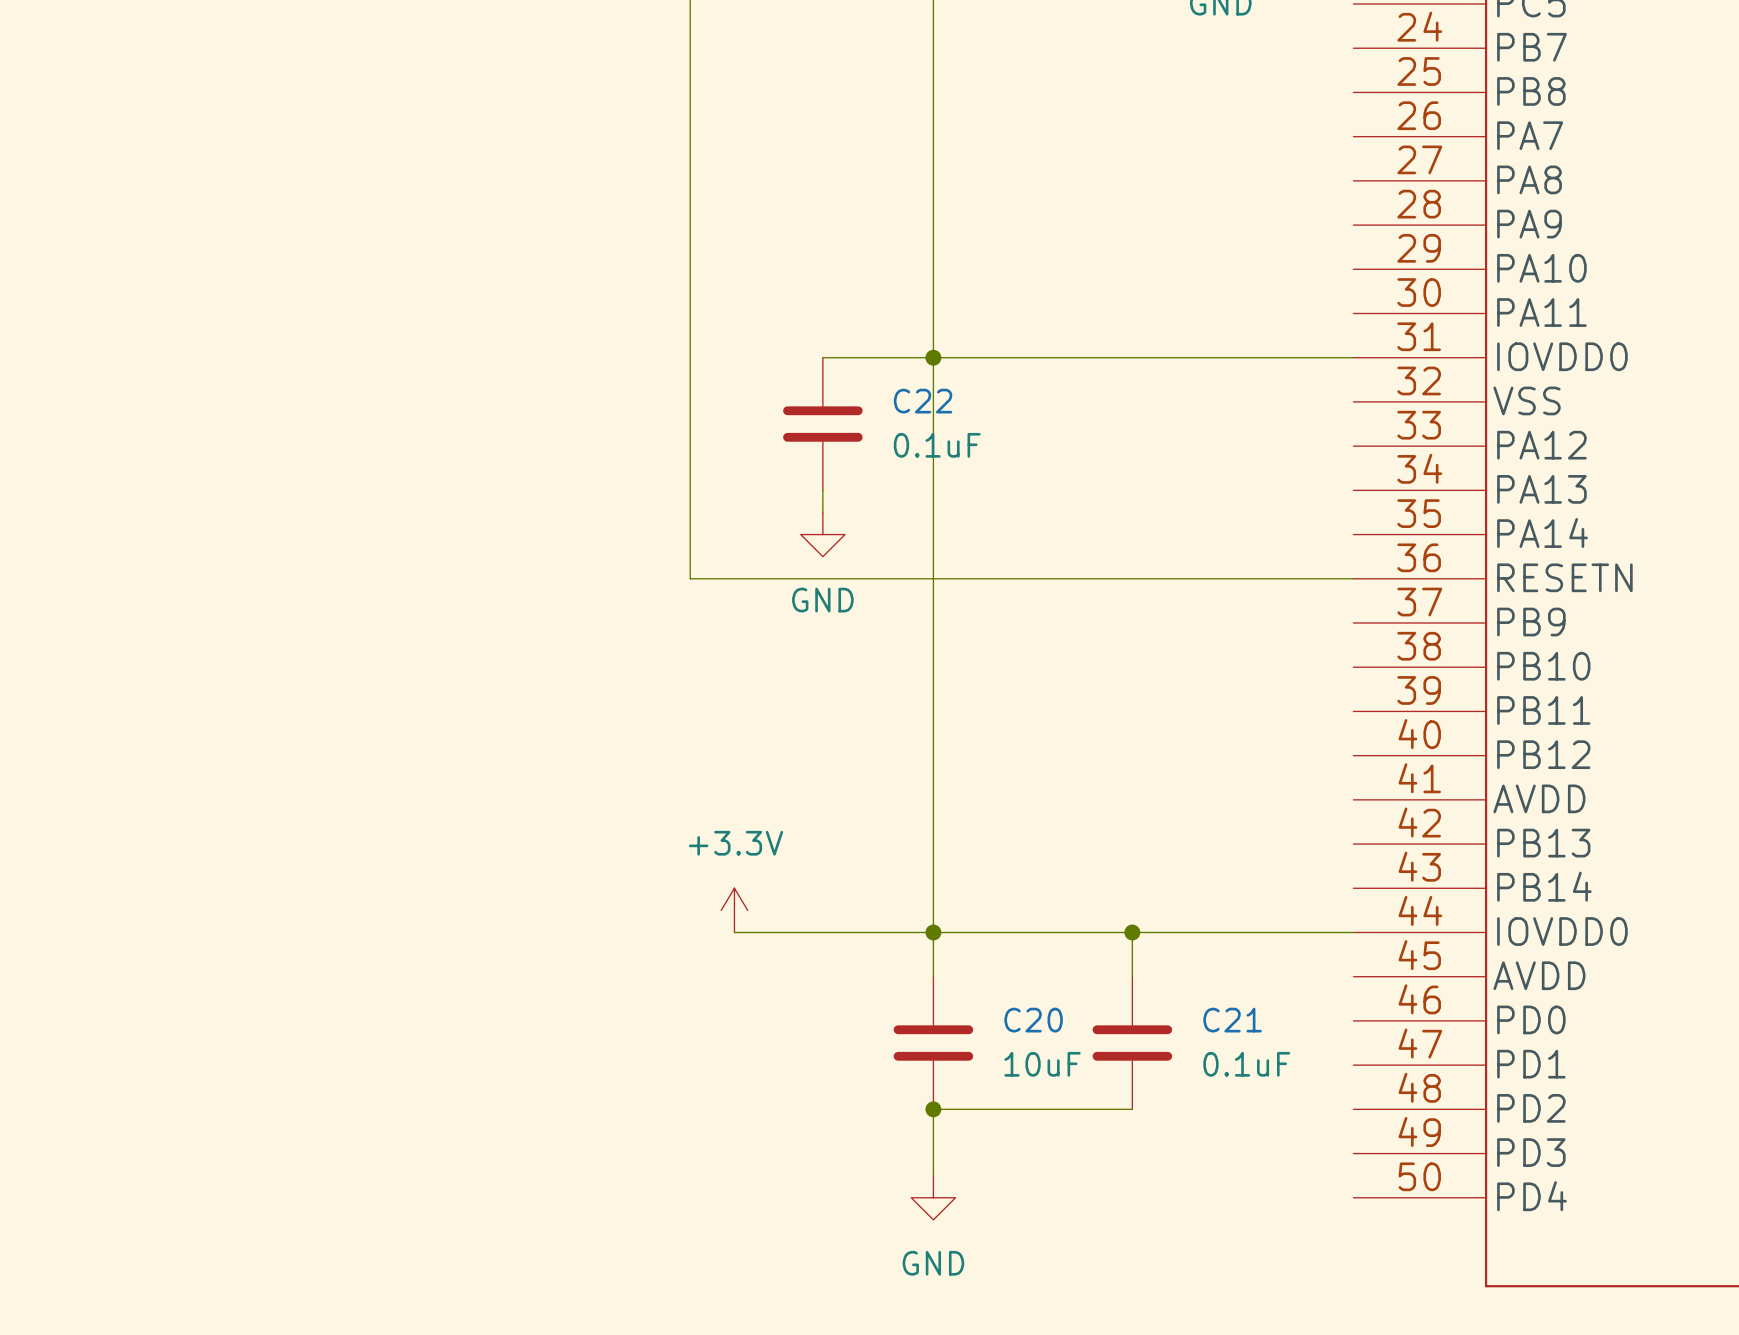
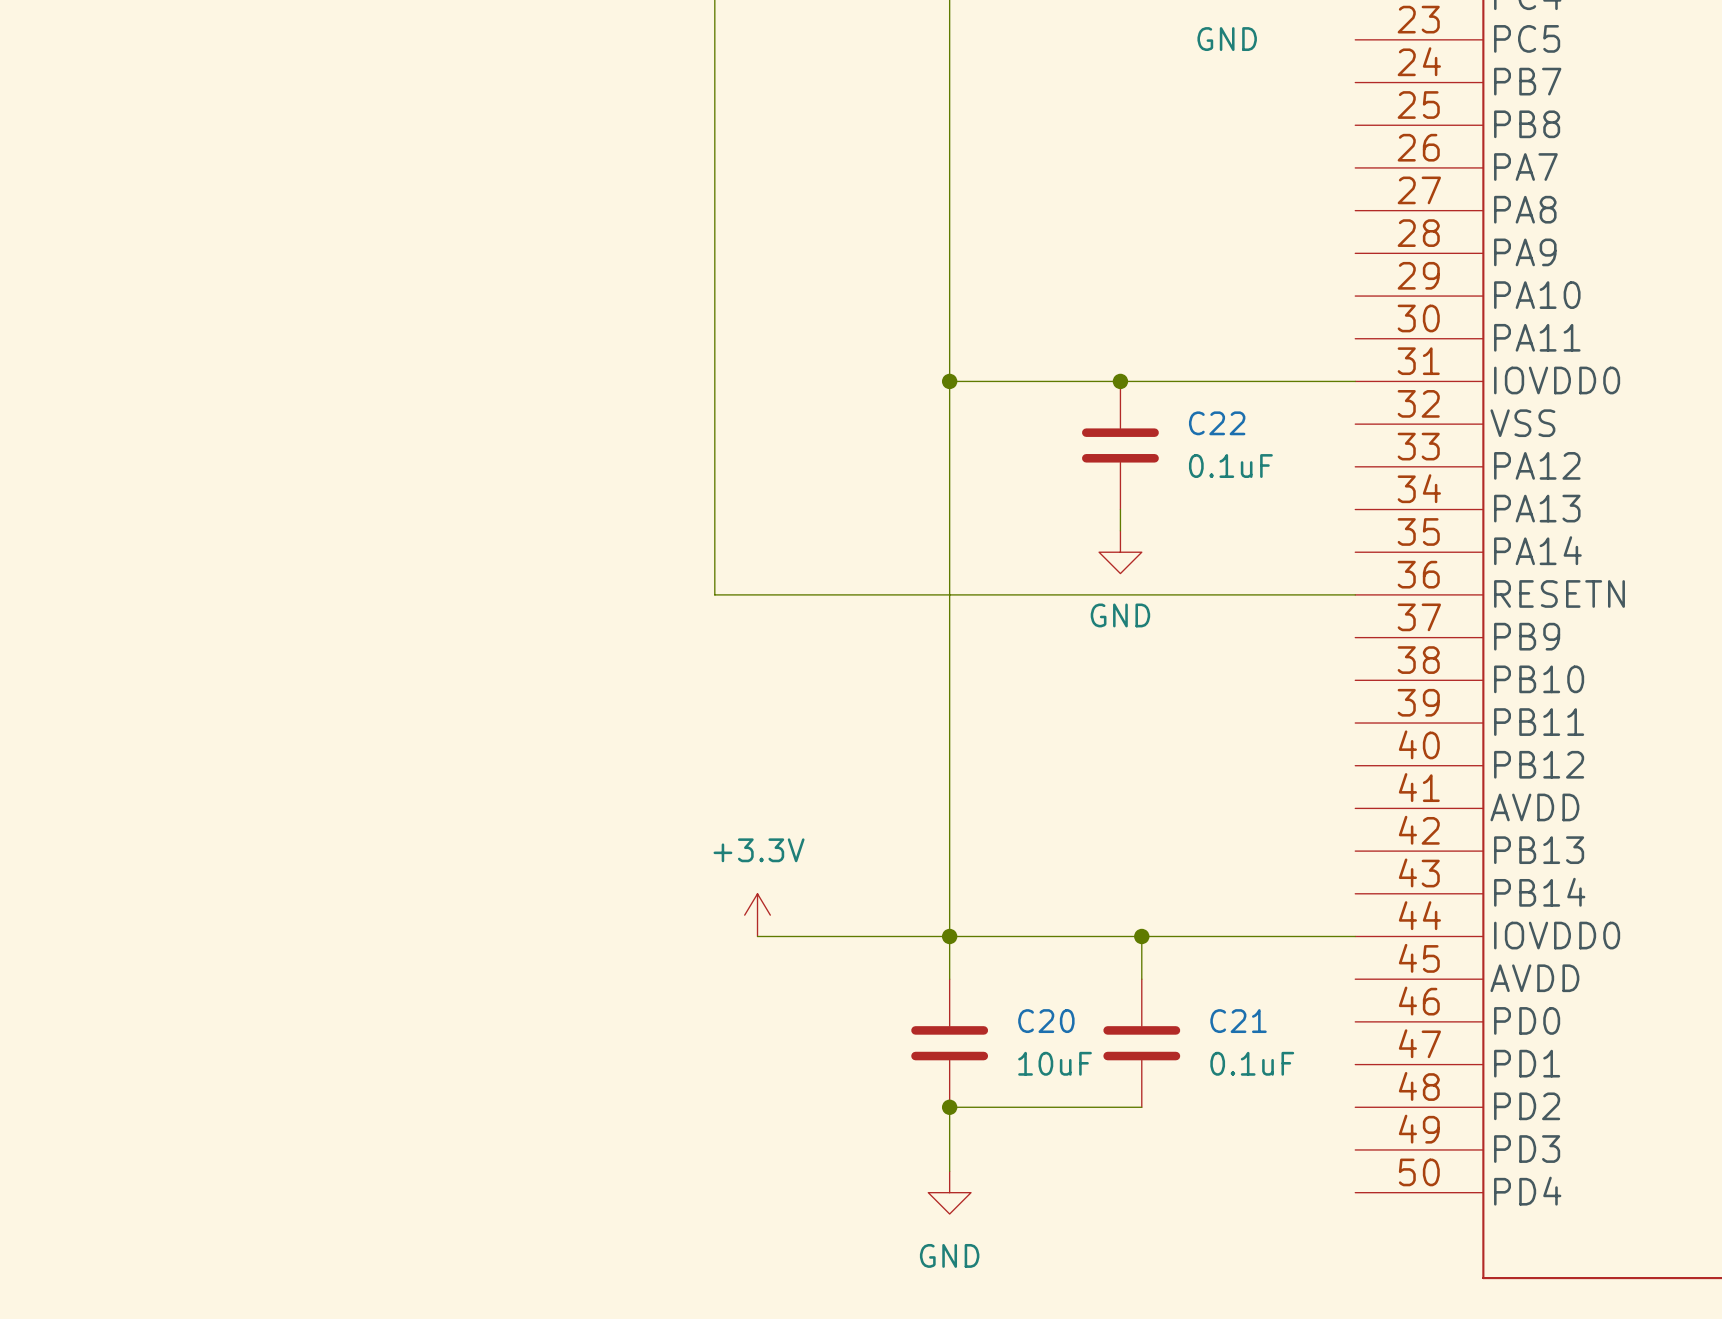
wire: (822, 357) (933, 357) -> none
junction: none -> (1120, 381)
C22 position: (822, 424) -> (1120, 445)
wire: (822, 490) (822, 512) -> (1120, 509) (1120, 530)
power symbol position: GND (822, 534) -> GND (1120, 552)

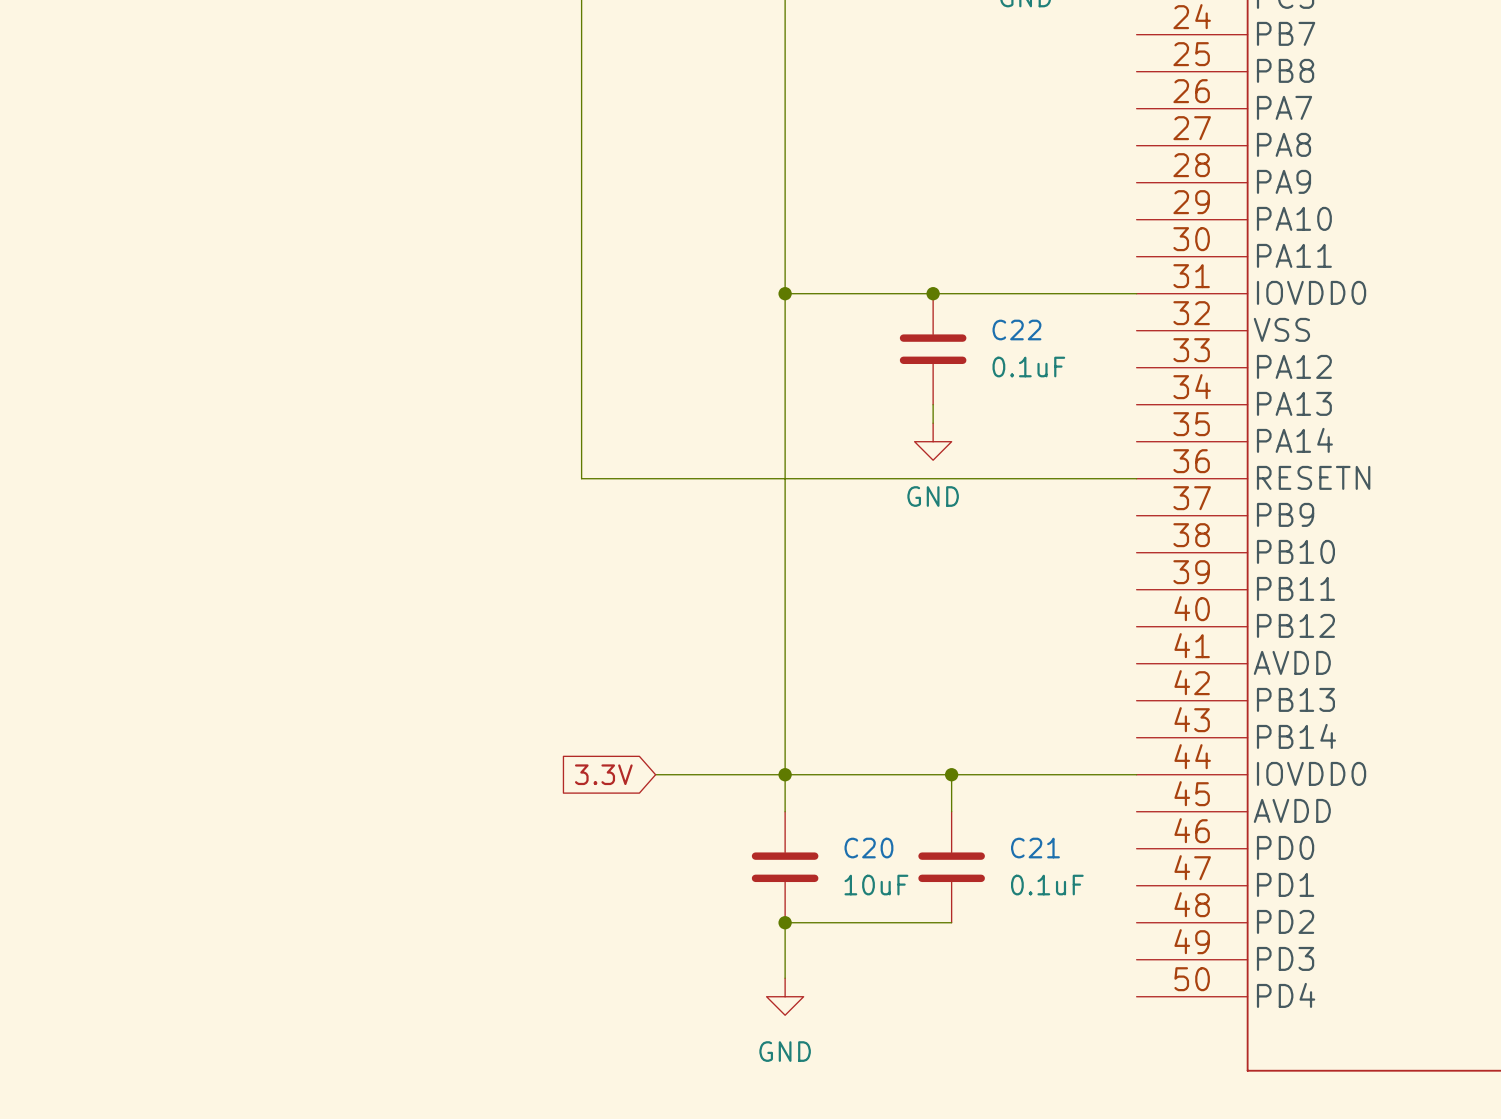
power symbol: +3.3V (757, 915) -> none
global label: none -> 3.3V (603, 774)
wire: (757, 936) (800, 936) -> none

